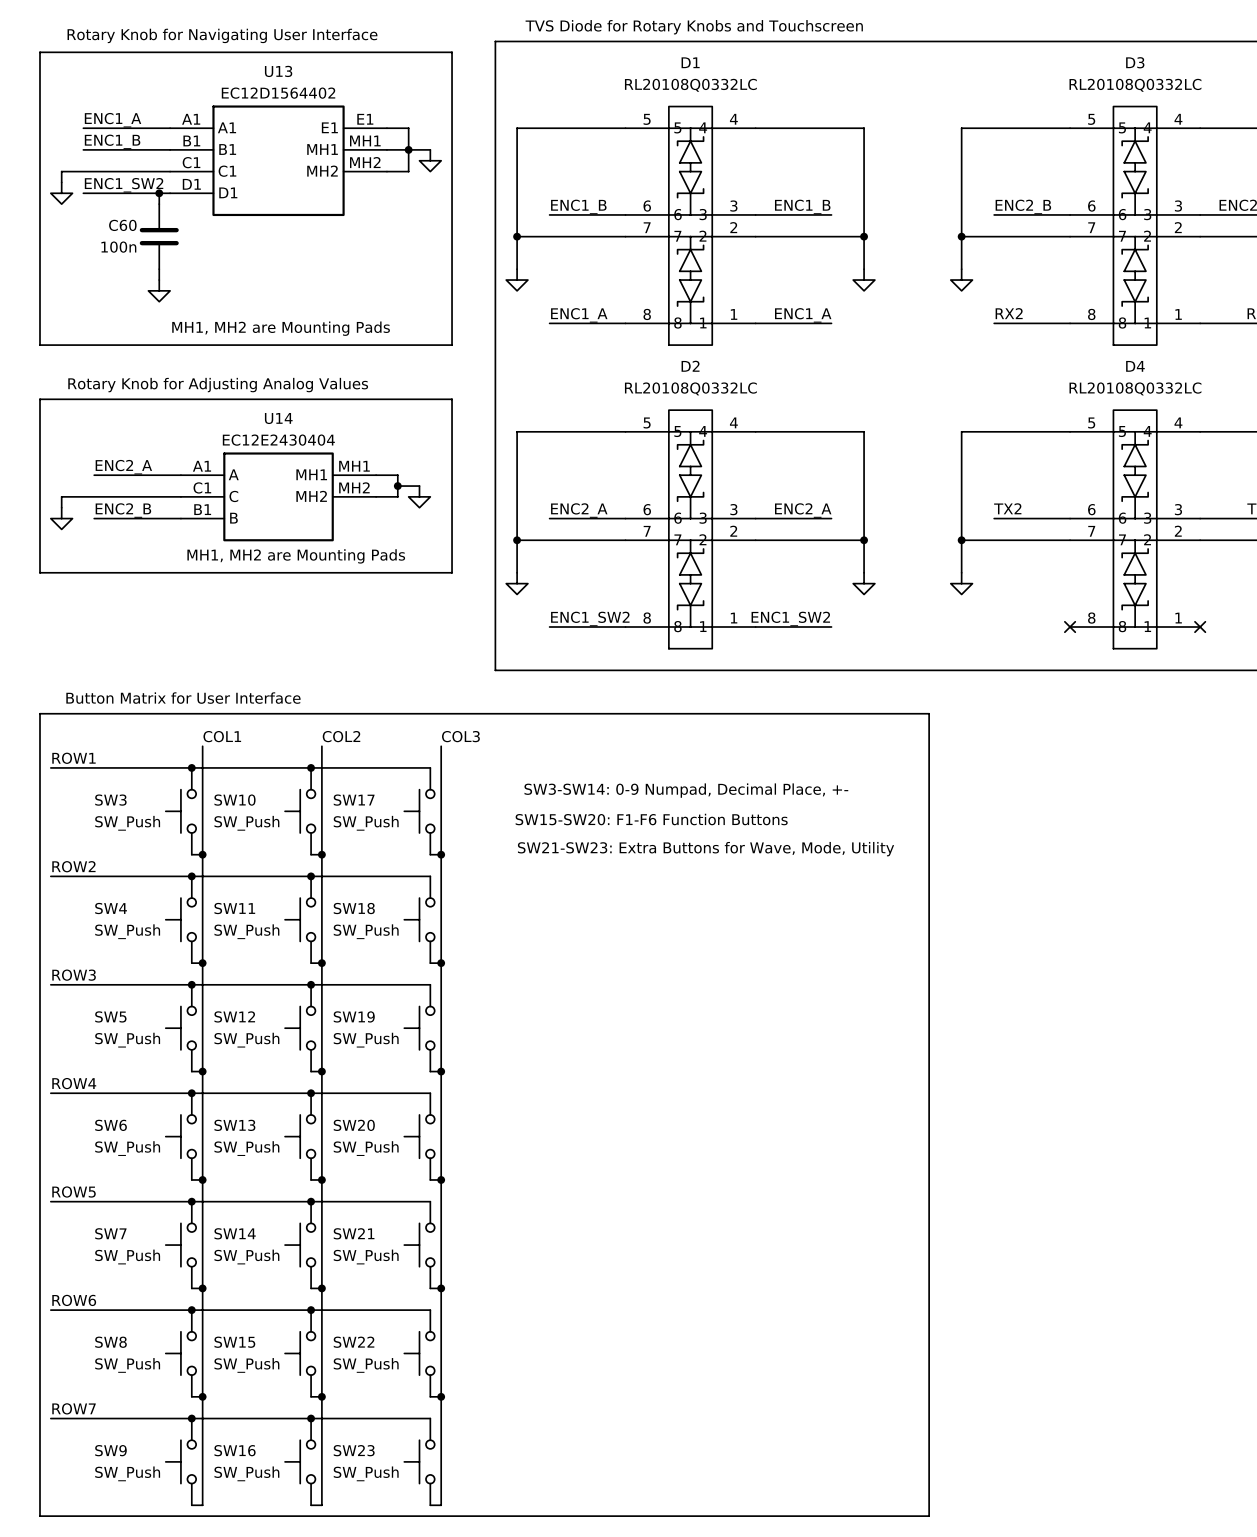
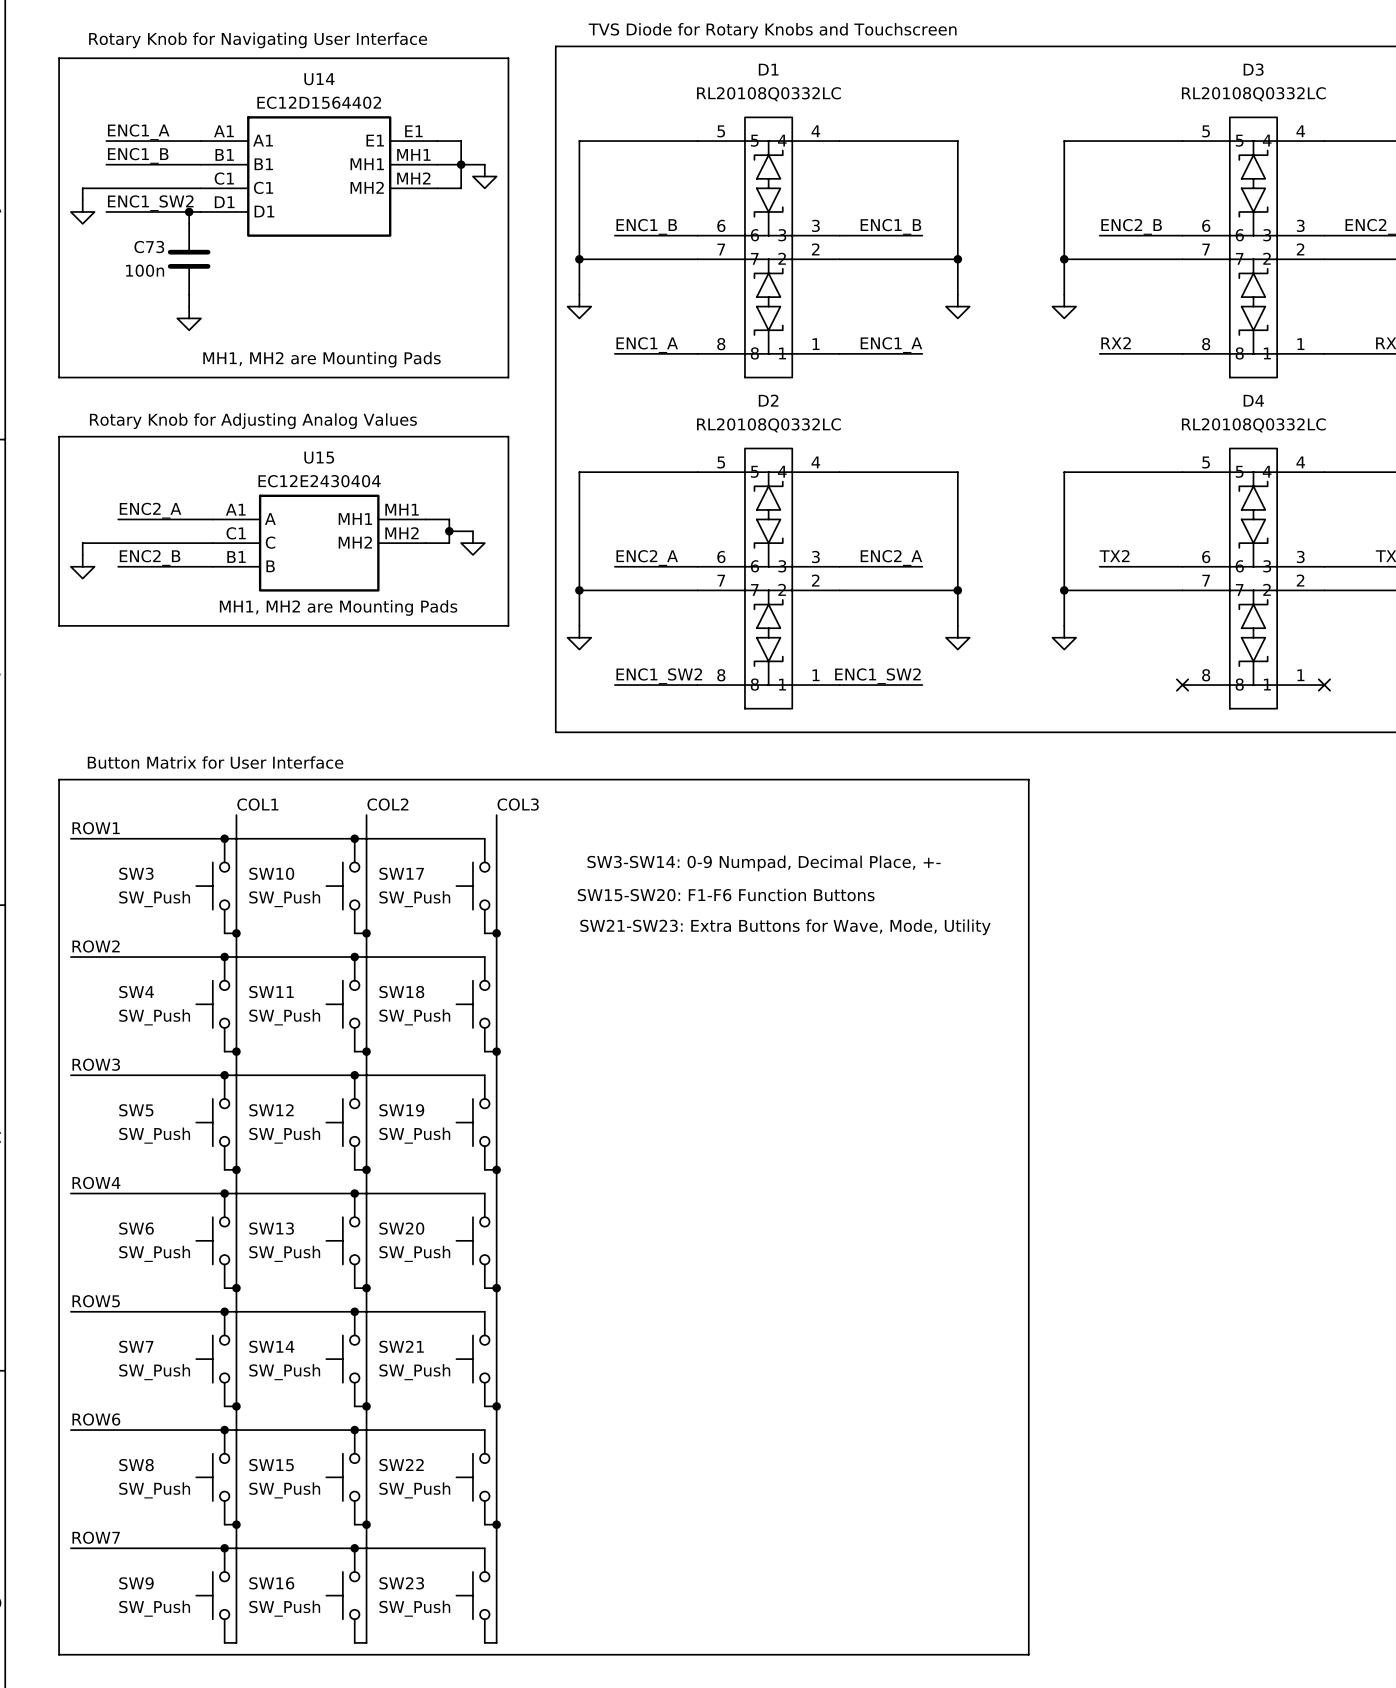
U13 name: U13 (278, 71) -> U14 (319, 79)
C60 name: C60 (122, 225) -> C73 (149, 247)
U14 name: U14 (278, 418) -> U15 (319, 457)

